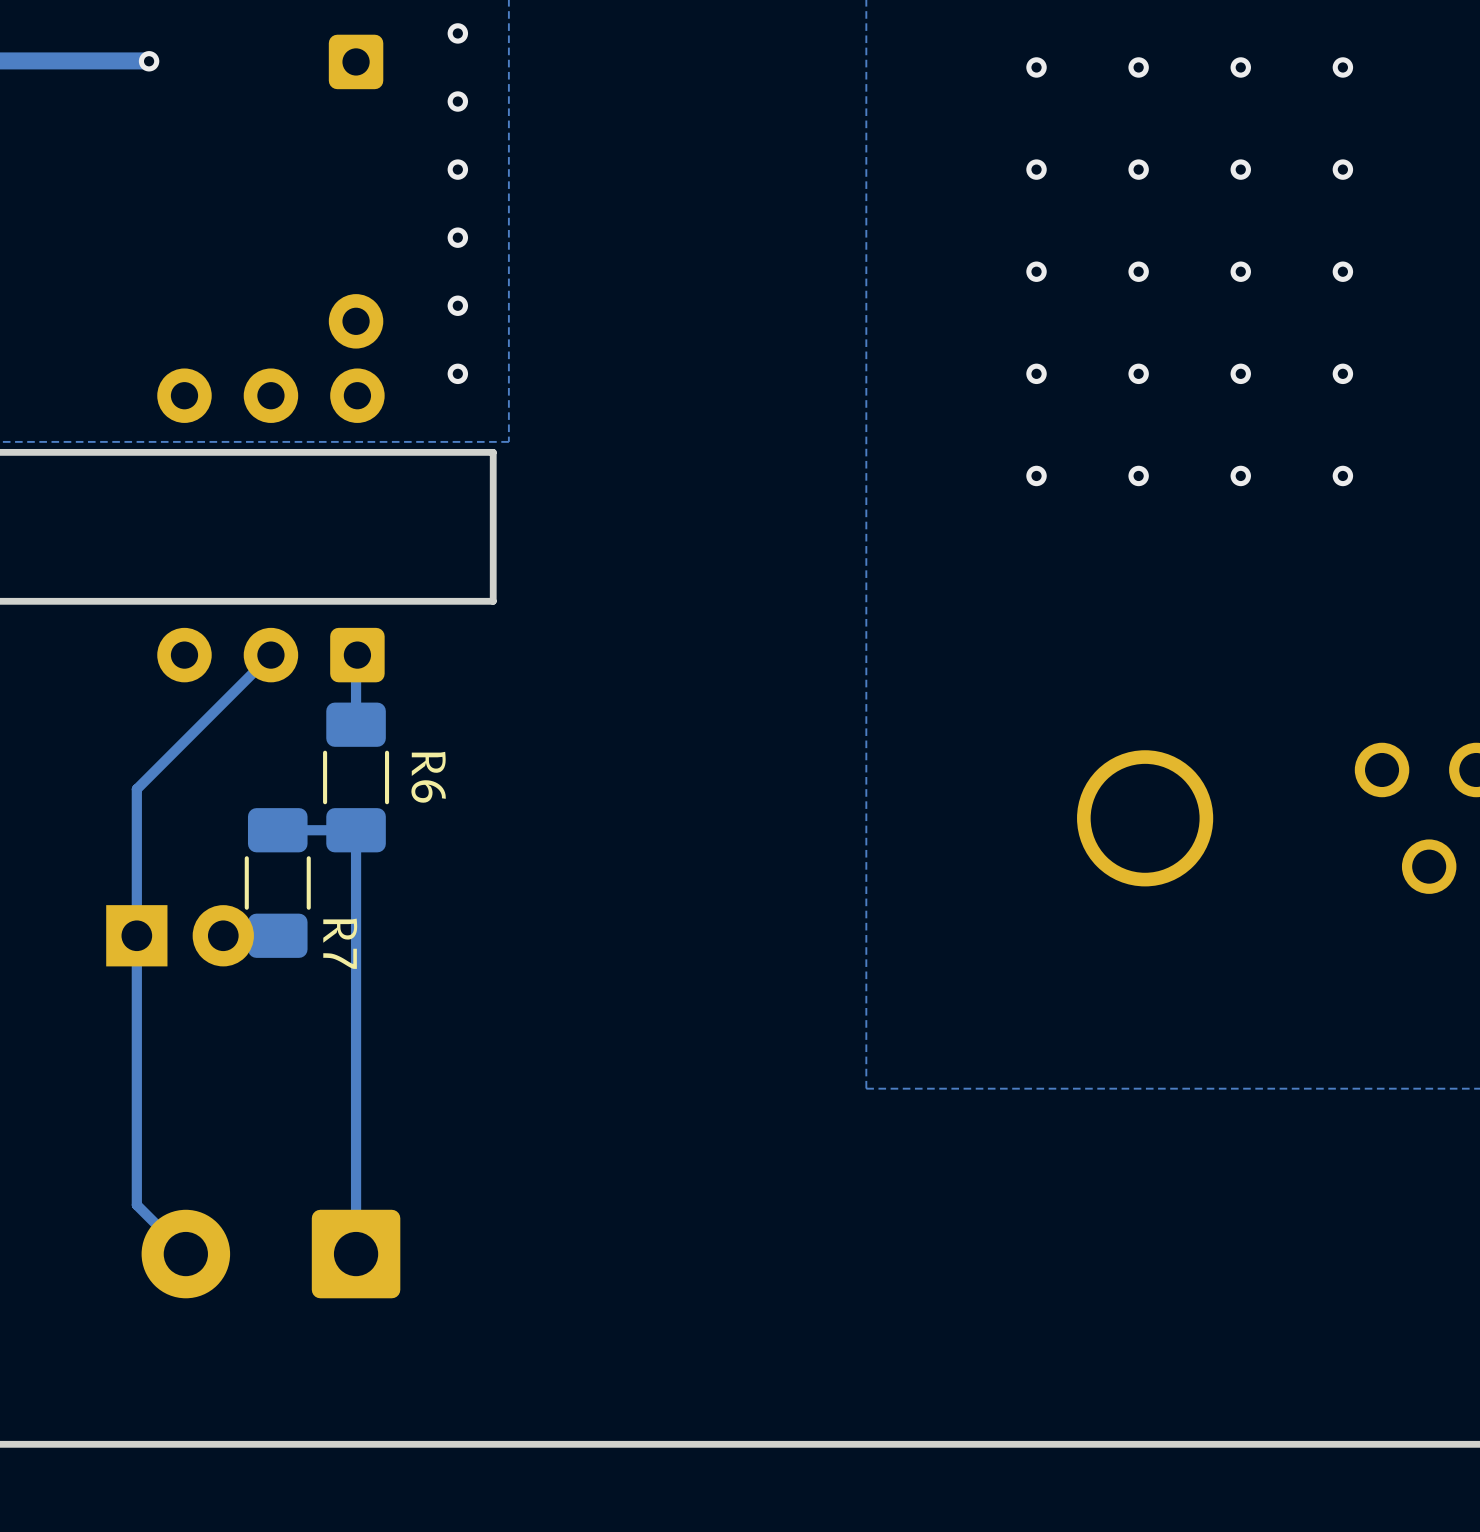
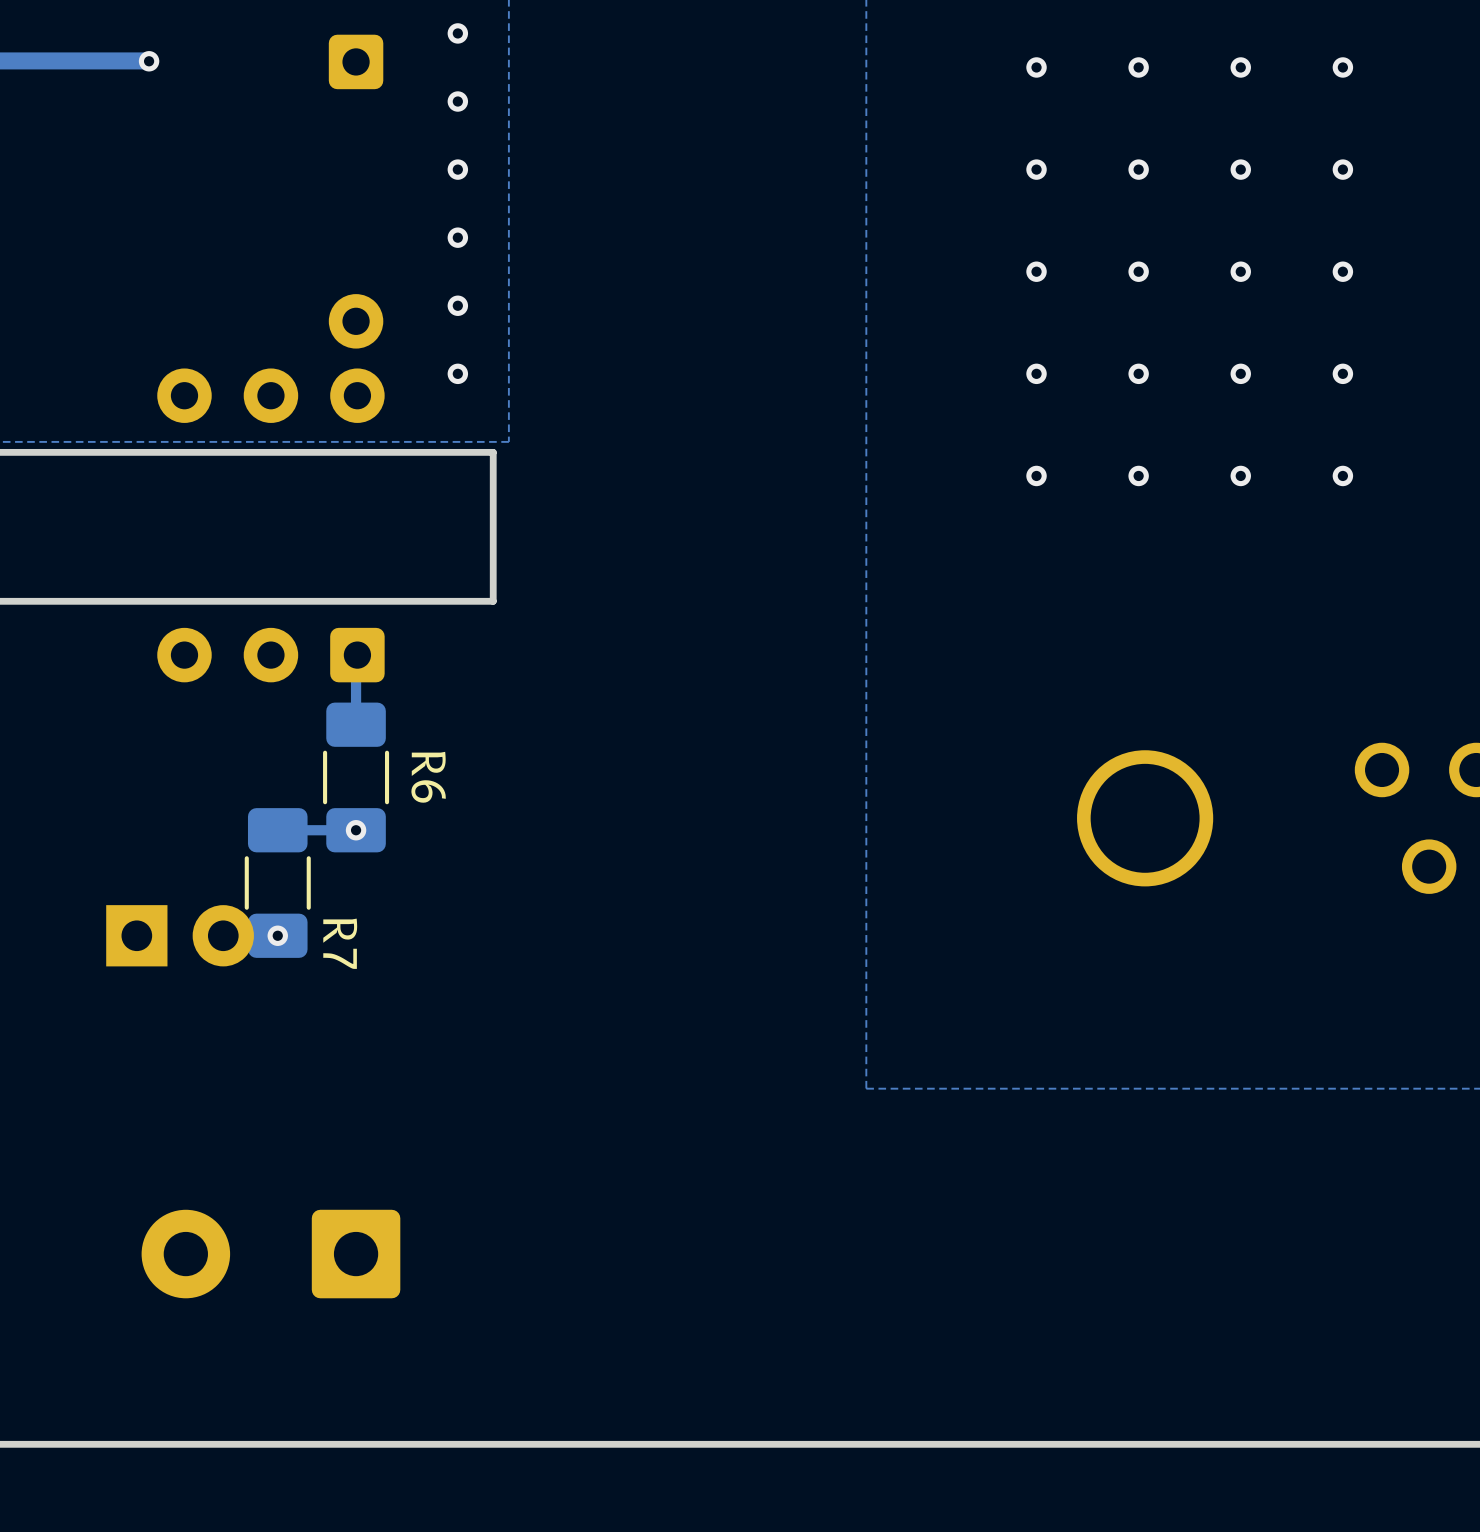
track: (270, 655) (136, 789) (136, 1205) (185, 1254) -> none
track: (356, 830) (356, 1254) -> none
via: none -> (356, 830)
via: none -> (277, 935)

